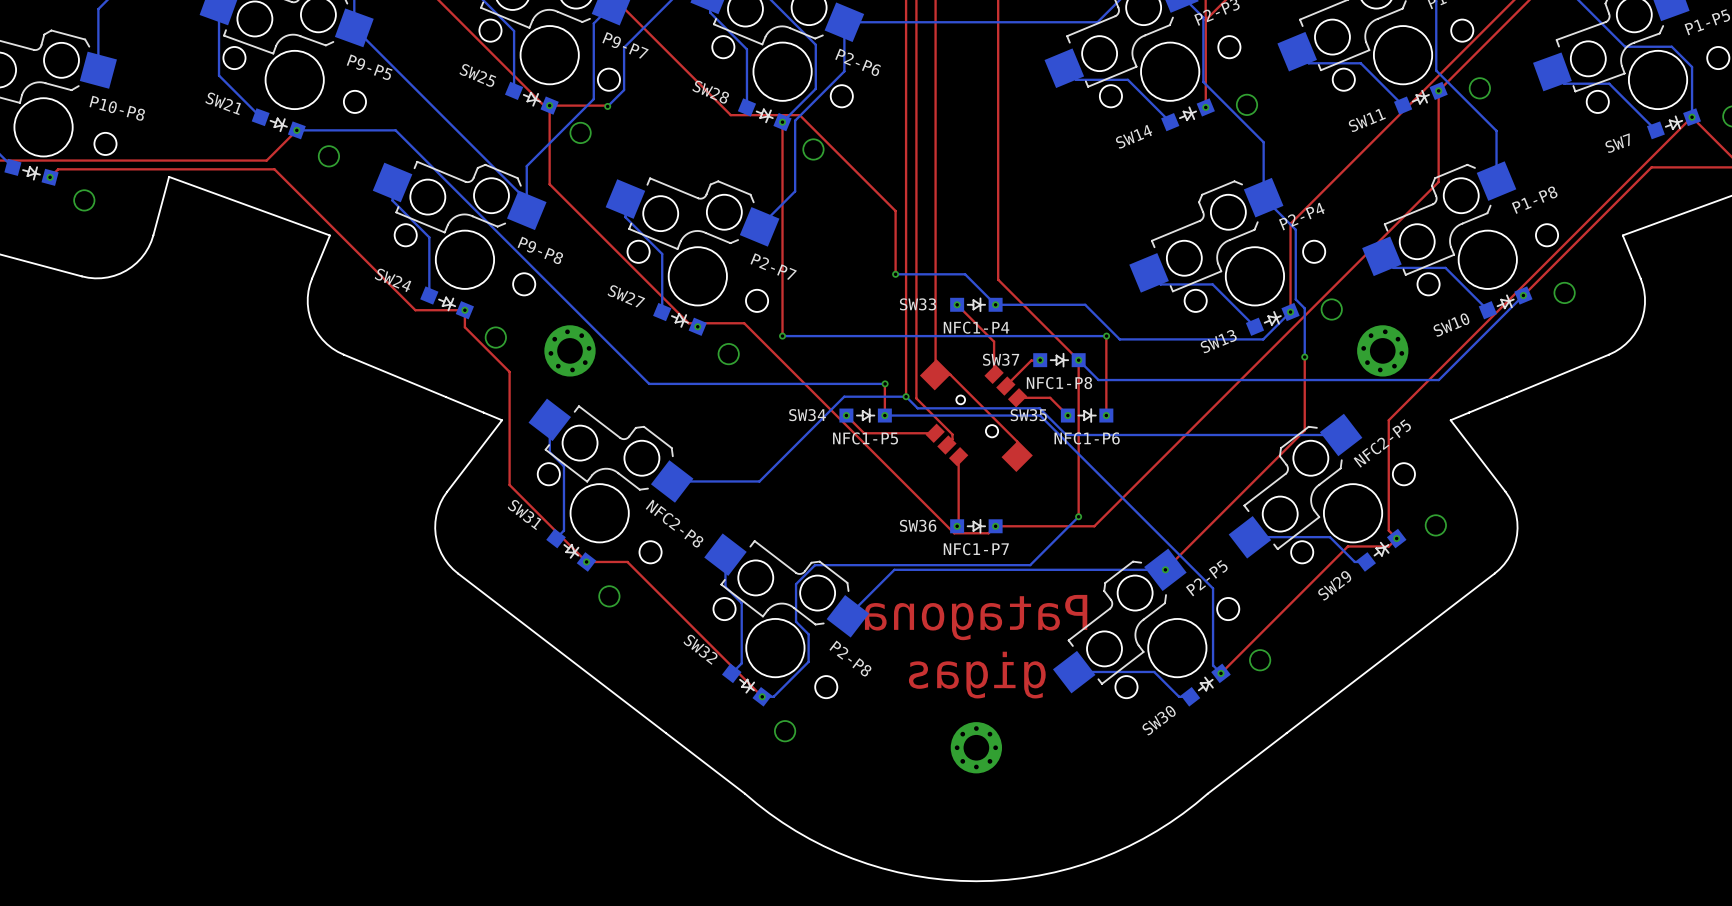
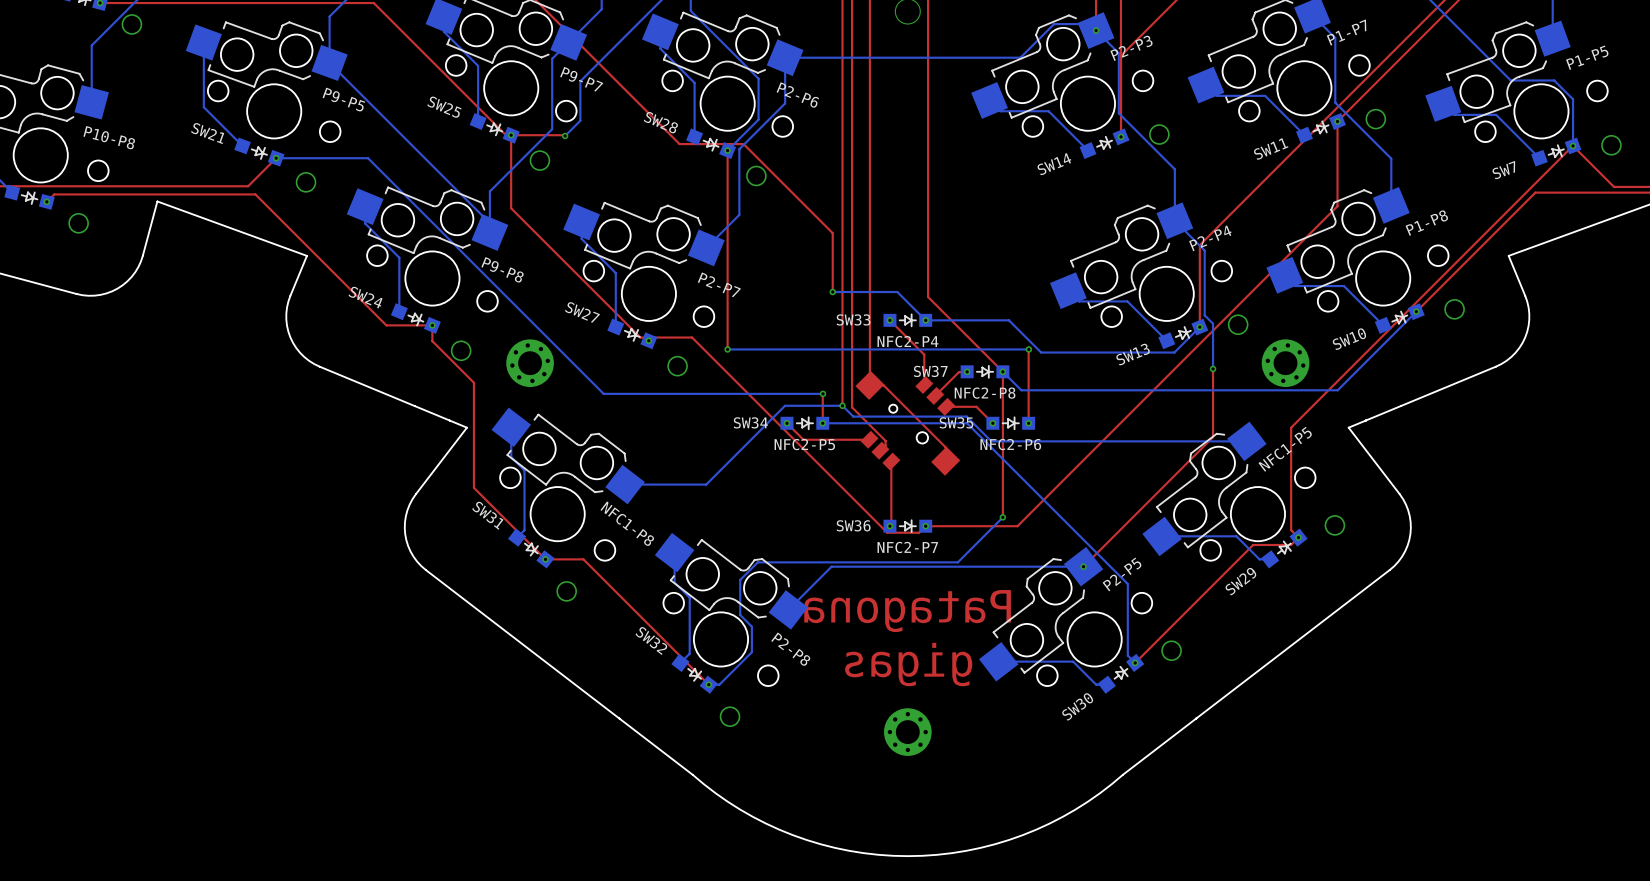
text: NFC1-P4 (976, 327) -> NFC2-P4 (907, 341)
text: NFC1-P8 (1059, 383) -> NFC2-P8 (985, 393)
text: NFC1-P5 (865, 438) -> NFC2-P5 (804, 444)
text: NFC1-P6 (1087, 438) -> NFC2-P6 (1010, 444)
text: NFC2-P5 (1382, 443) -> NFC1-P5 (1285, 449)
text: NFC2-P8 (674, 523) -> NFC1-P8 (627, 523)
text: NFC1-P7 (976, 549) -> NFC2-P7 (907, 547)

